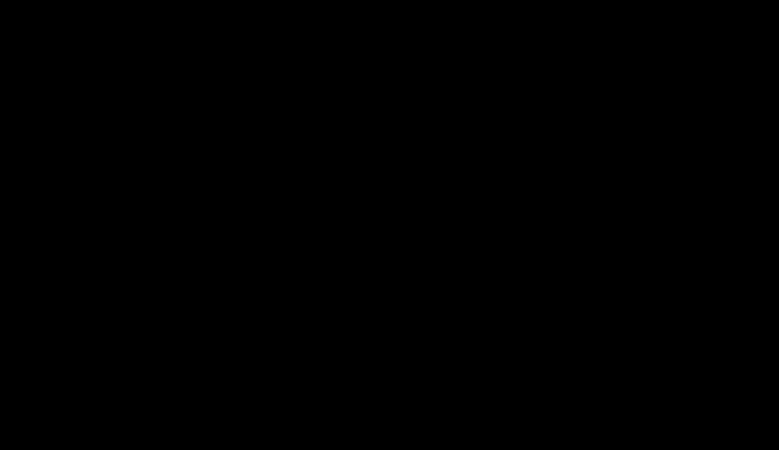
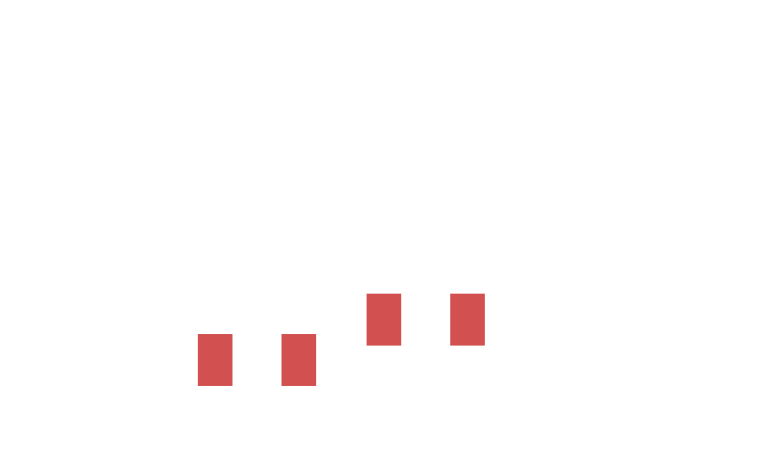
part: none -> (425, 319)
part: none -> (256, 359)

